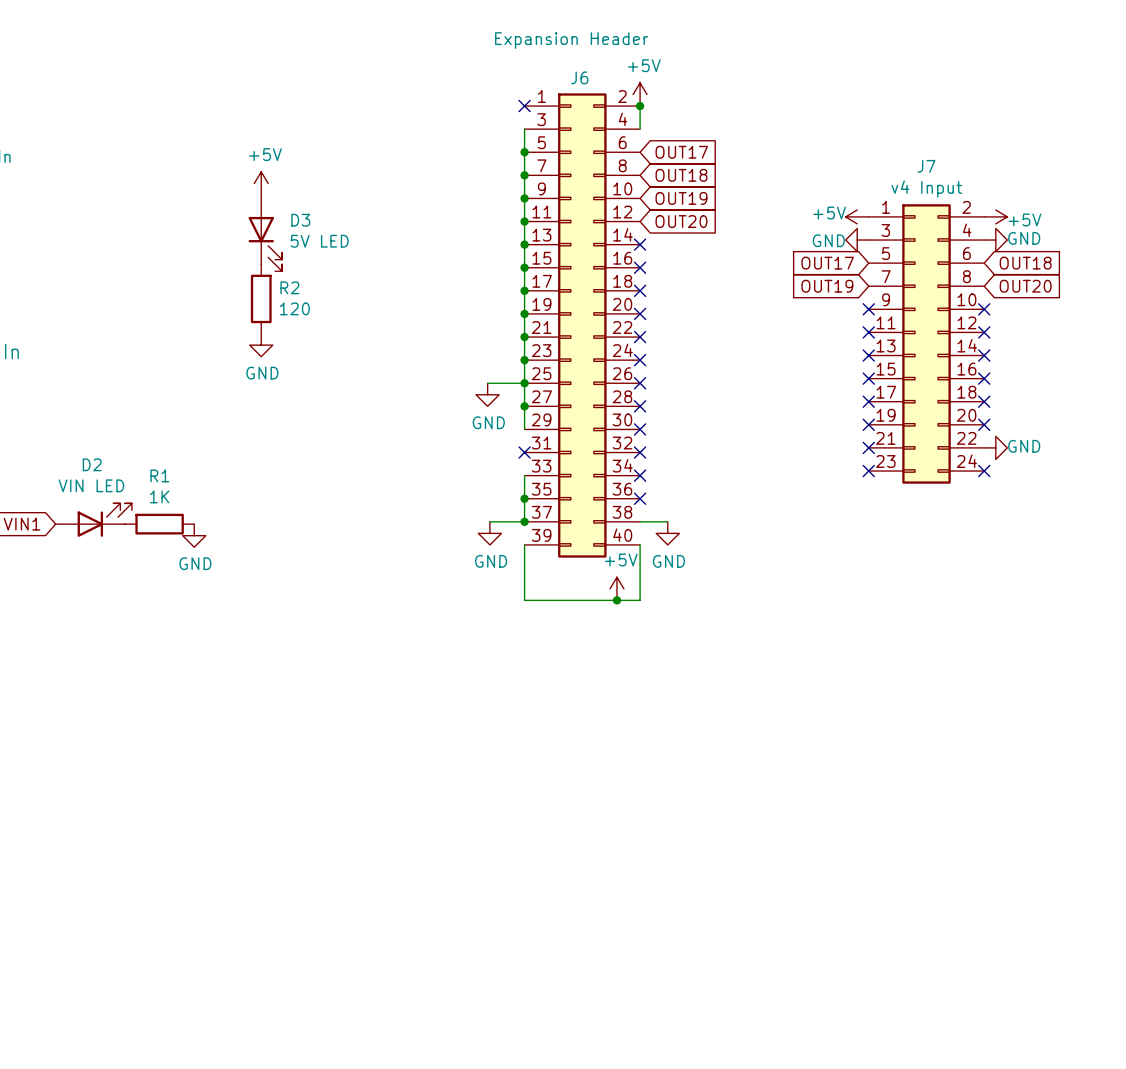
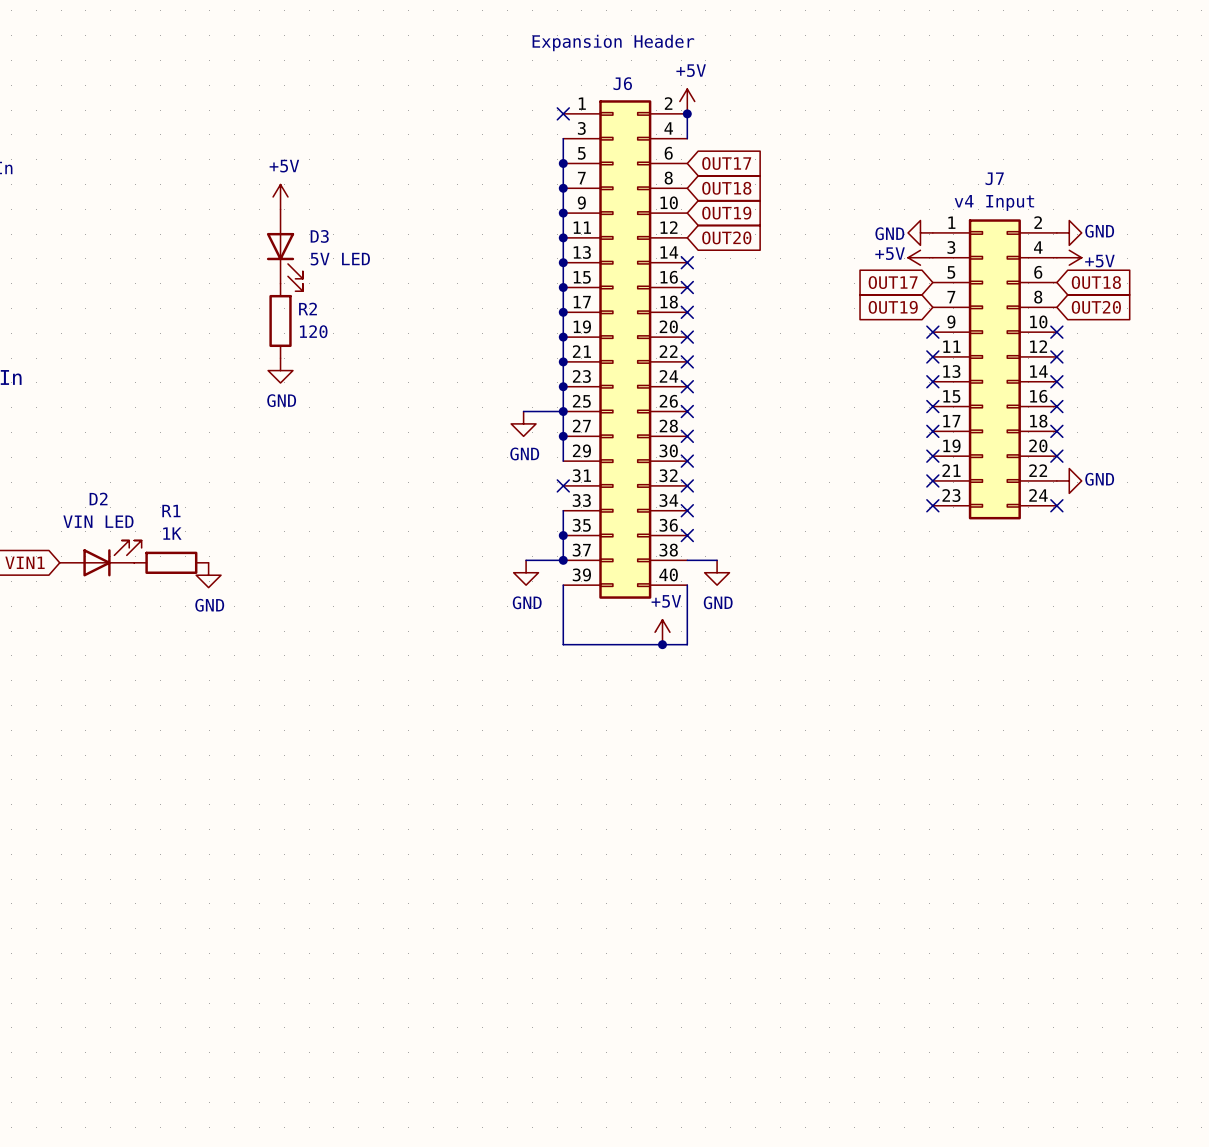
power symbol: +5V (857, 216) -> GND (920, 232)
power symbol: +5V (995, 216) -> GND (1069, 232)
power symbol: GND (857, 240) -> +5V (920, 257)
power symbol: GND (995, 240) -> +5V (1069, 257)

